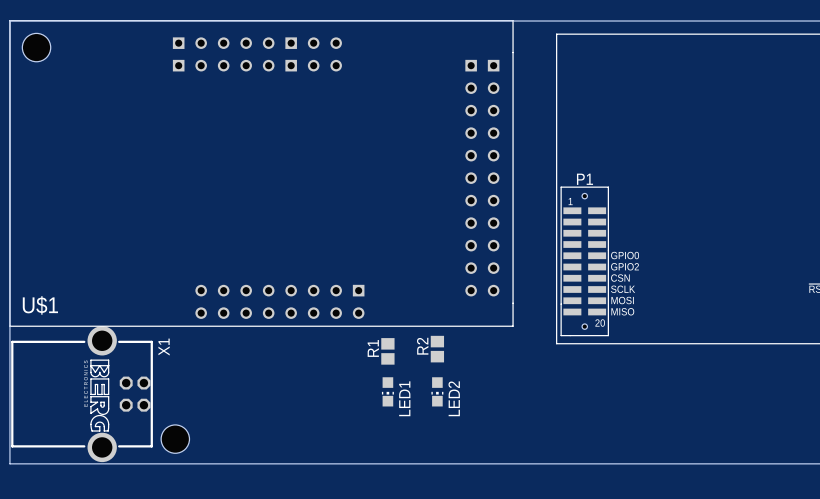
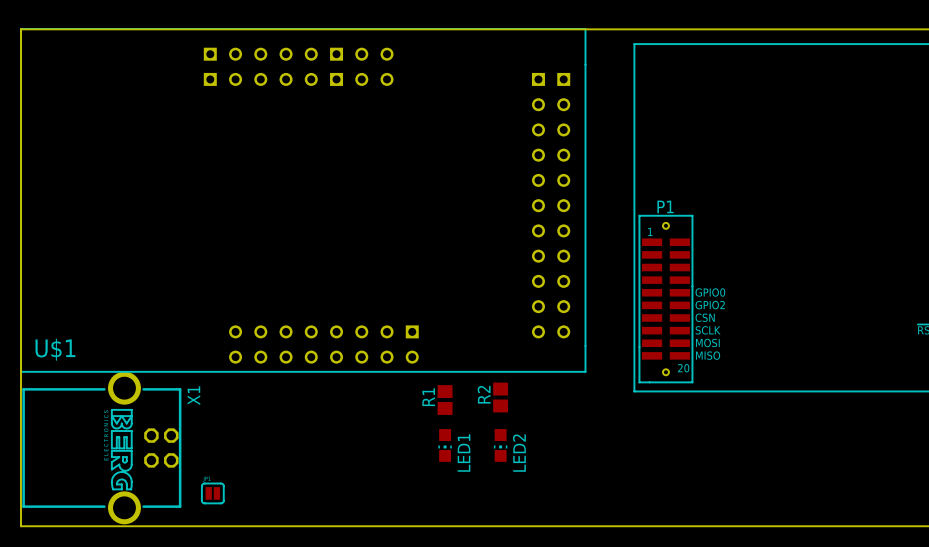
hole: (36, 47) -> none
part: none -> (212, 493)
hole: (175, 439) -> none

